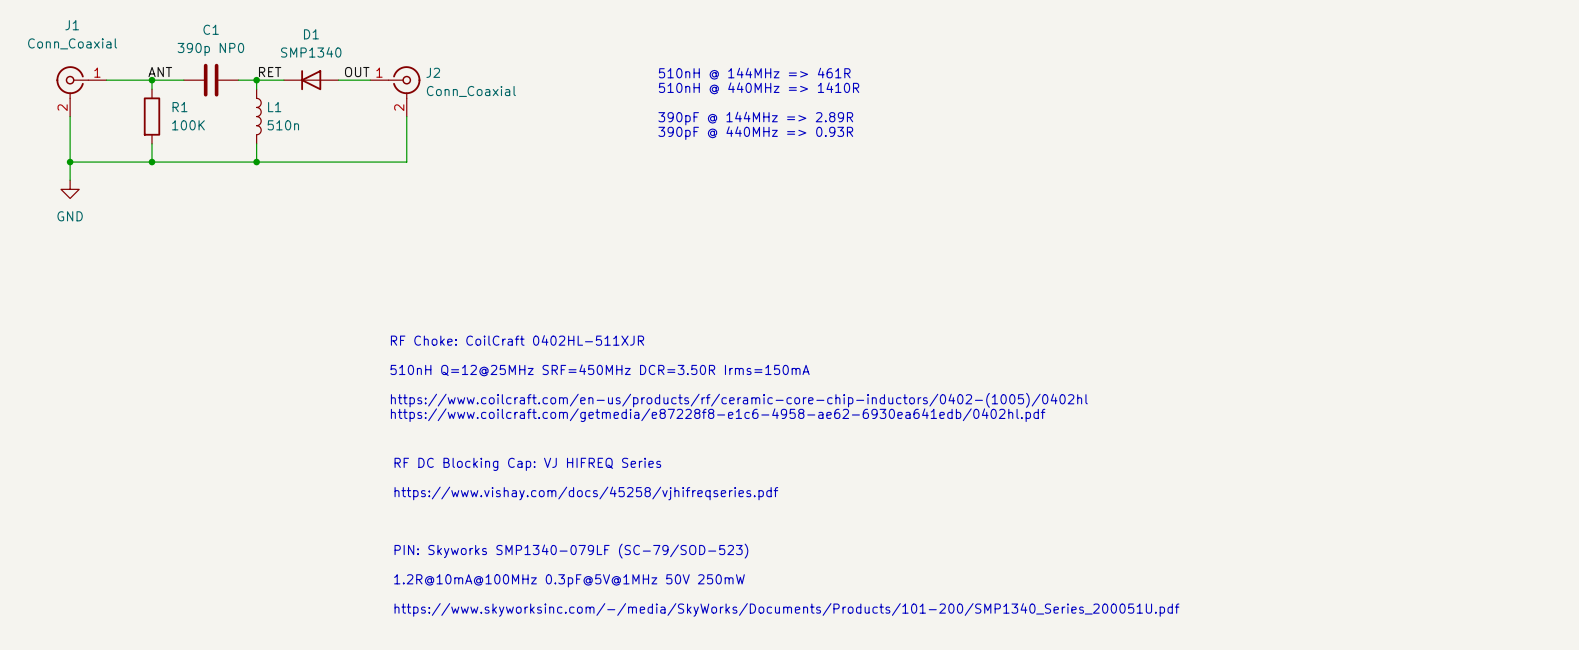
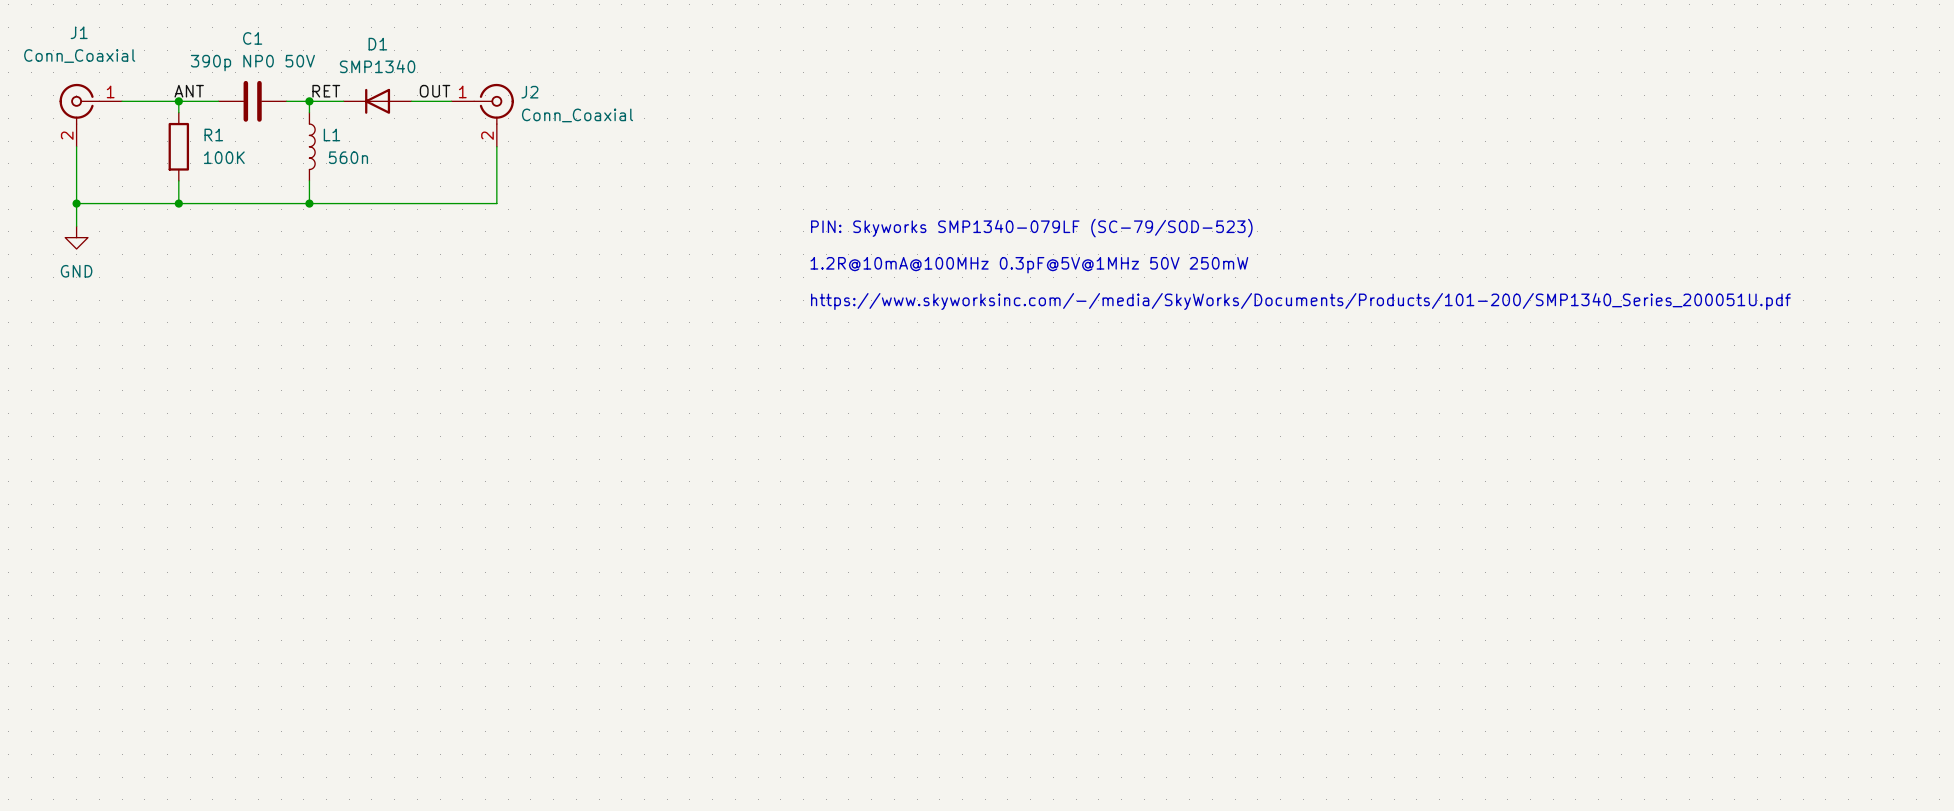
C1 value: 390p NP0 (210, 49) -> 390p NP0 50V (252, 63)
text: 510nH @ 144MHz => 461R (754, 73) -> none
text: 510nH @ 440MHz => 1410R (759, 88) -> none
text: 390pF @ 144MHz => 2.89R (755, 118) -> none
L1 value: 510n (283, 125) -> 560n (348, 157)
text: 390pF @ 440MHz => 0.93R (755, 133) -> none
text: none -> PIN: Skyworks SMP1340-079LF (SC-79/SOD-523) (1031, 228)
text: none -> 1.2R@10mA@100MHz 0.3pF@5V@1MHz 50V 250mW (1029, 265)
text: none -> https://www.skyworksinc.com/-/media/SkyWorks/Documents/Products/101-200/SMP1340_Series_200051U.pdf (1300, 301)
text: RF Choke: CoilCraft 0402HL-511XJR (517, 340) -> none
text: 510nH Q=12@25MHz SRF=450MHz DCR=3.50R Irms=150mA (600, 370) -> none
text: https://www.coilcraft.com/en-us/products/rf/ceramic-core-chip-inductors/0402-(1005)/0402hl (739, 400) -> none
text: https://www.coilcraft.com/getmedia/e87228f8-e1c6-4958-ae62-6930ea641edb/0402hl.pdf (718, 415) -> none
text: RF DC Blocking Cap: VJ HIFREQ Series (527, 464) -> none
text: https://www.vishay.com/docs/45258/vjhifreqseries.pdf (586, 493) -> none
text: PIN: Skyworks SMP1340-079LF (SC-79/SOD-523) (571, 551) -> none
text: 1.2R@10mA@100MHz 0.3pF@5V@1MHz 50V 250mW (569, 580) -> none
text: https://www.skyworksinc.com/-/media/SkyWorks/Documents/Products/101-200/SMP1340_Series_200051U.pdf (786, 609) -> none

